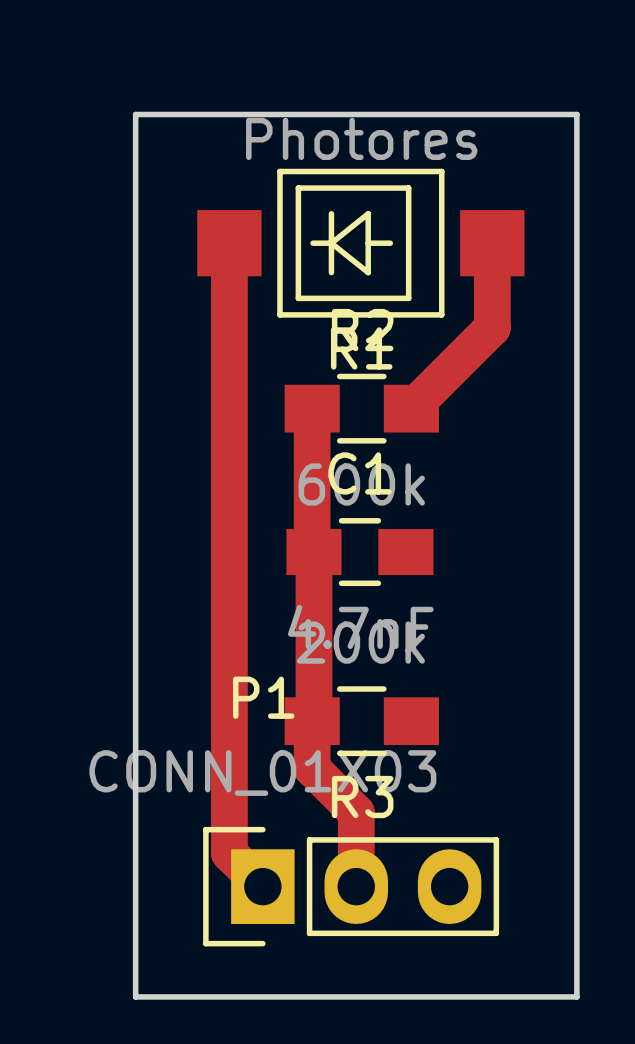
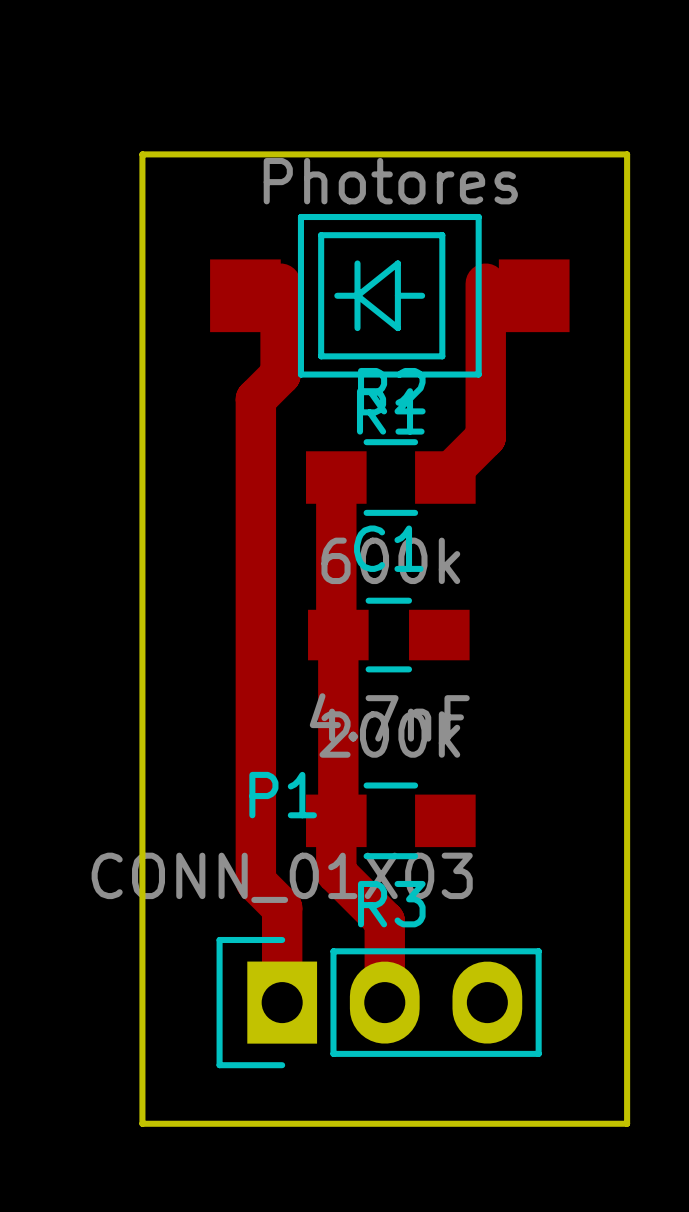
top track: (229, 243) (229, 853) (262, 886) -> (280, 283) (280, 374) (255, 399) (255, 881) (282, 908) (282, 1002)
top track: (492, 243) (492, 327) (448, 371) -> (485, 283) (485, 437)

